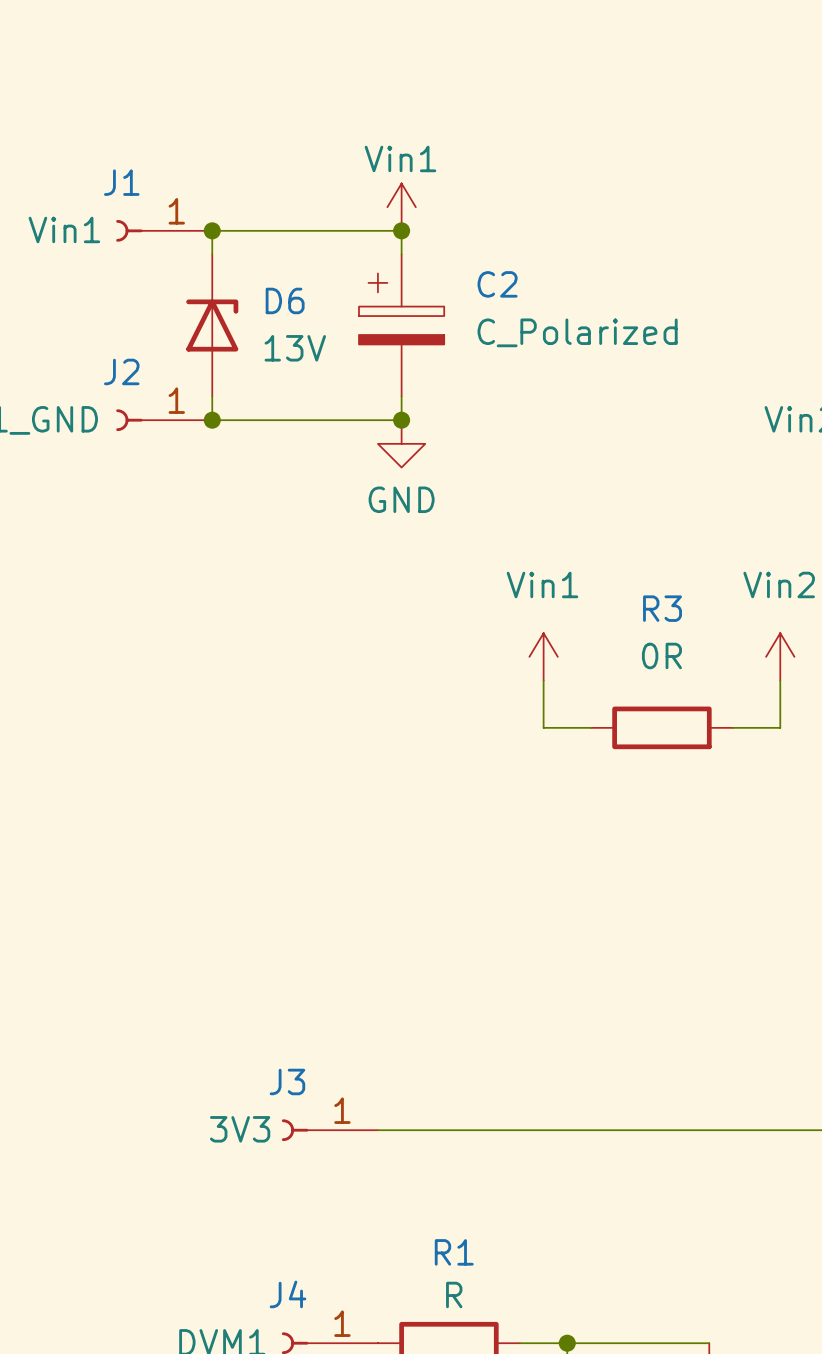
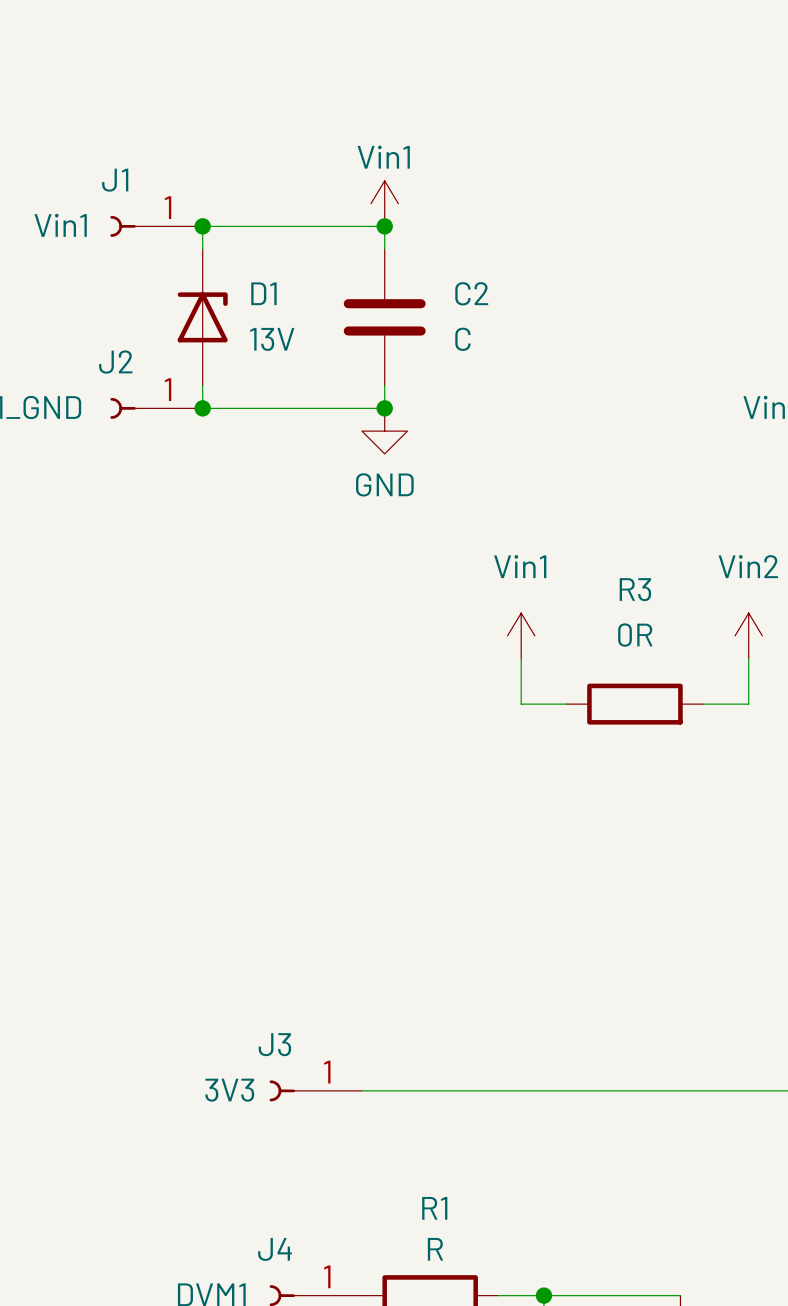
C2 symbol: [359, 254, 445, 397] -> [343, 249, 426, 386]
D6 name: D6 (285, 300) -> D1 (263, 293)
C2 value: C_Polarized (577, 332) -> C (462, 339)

